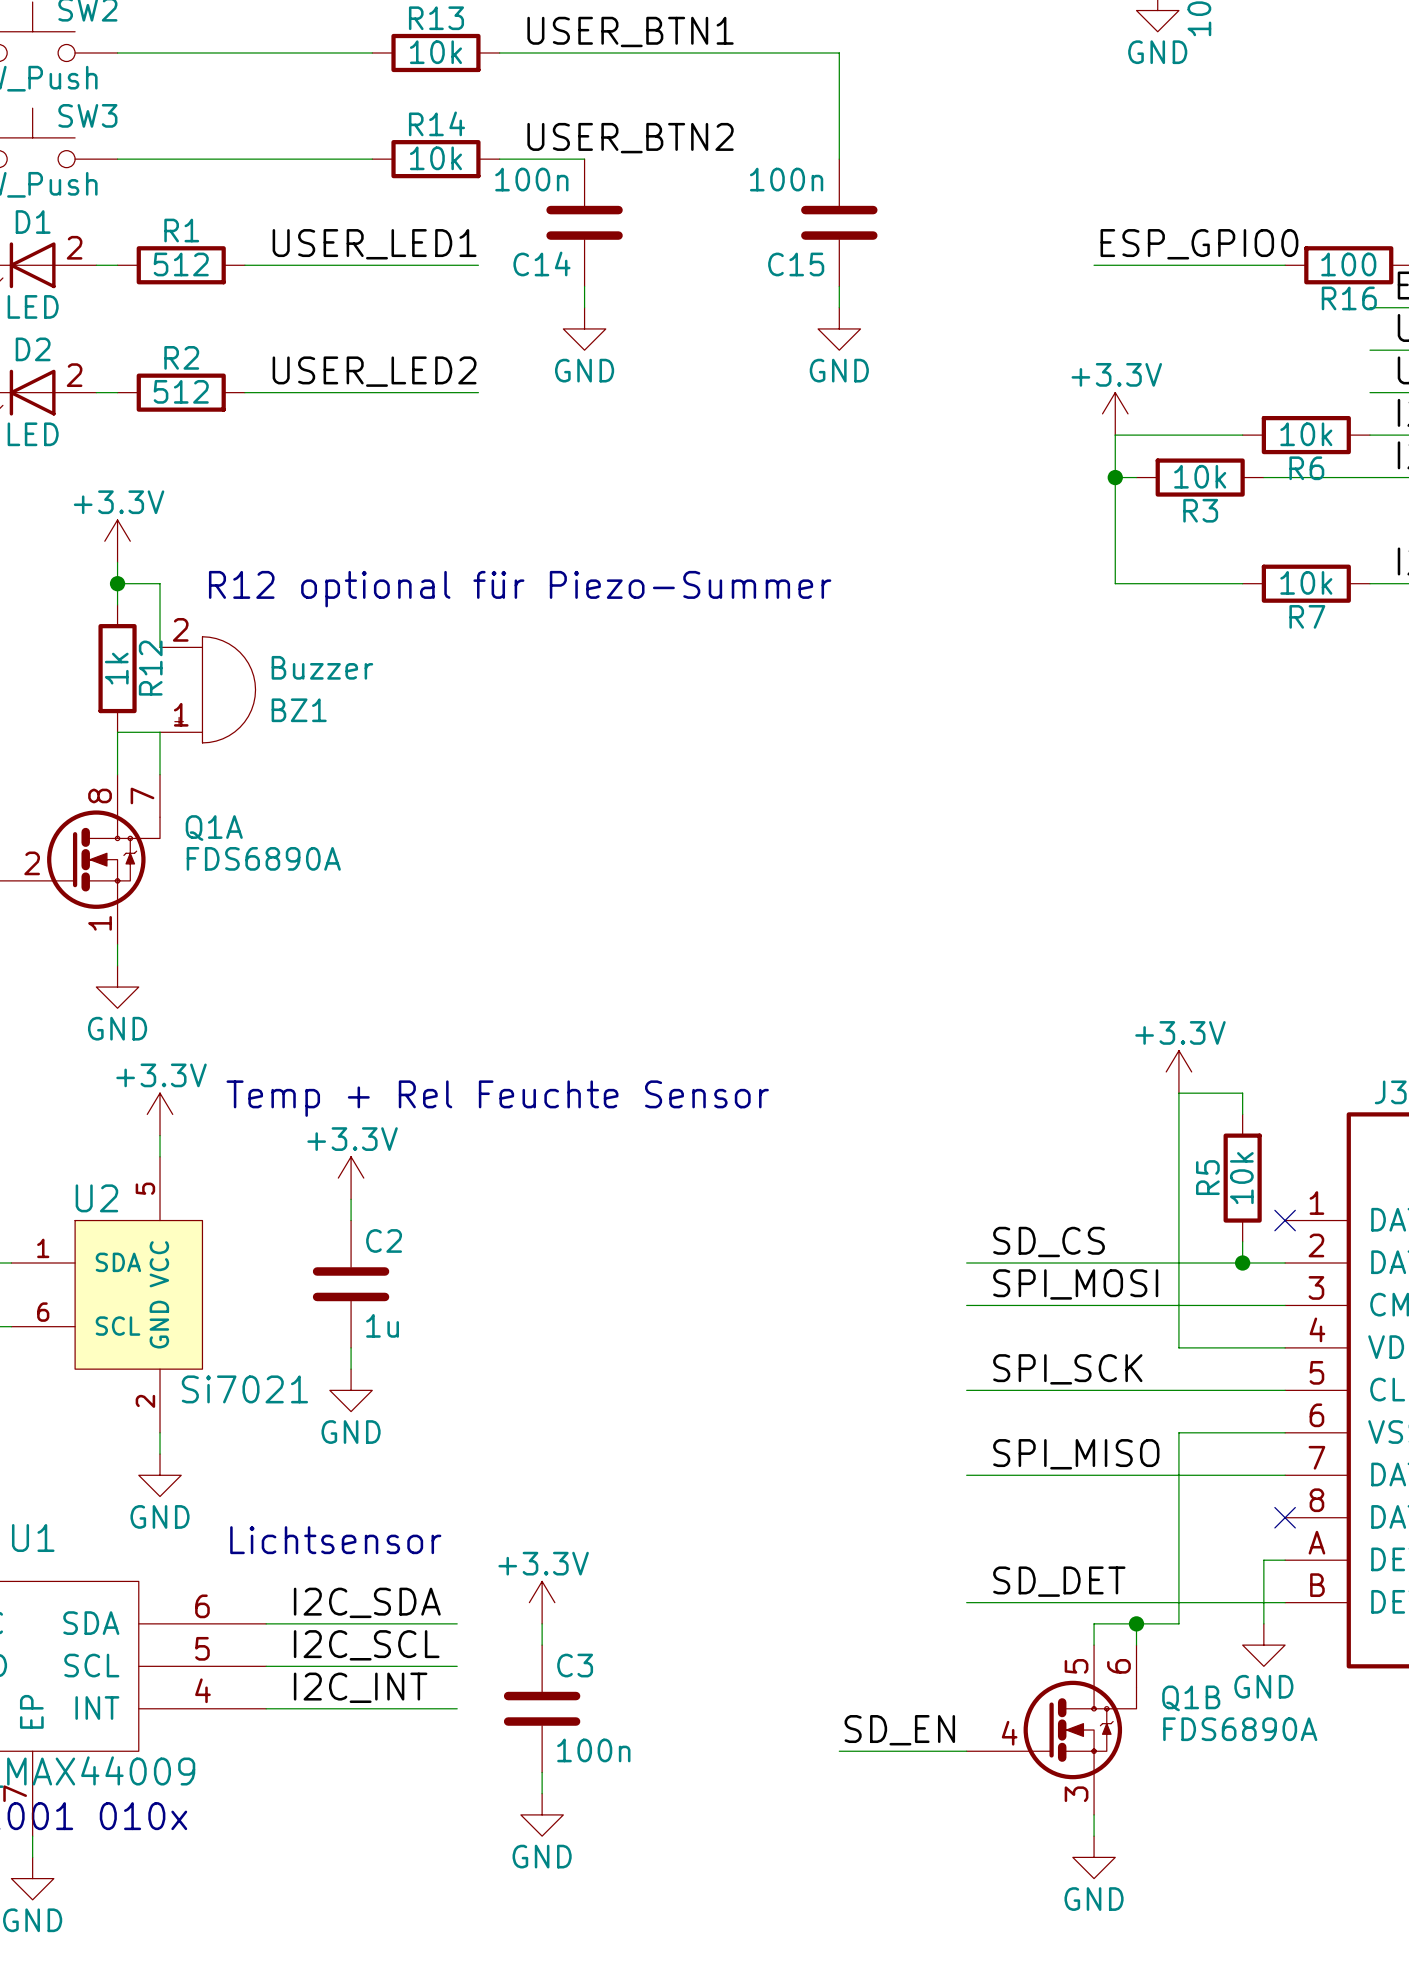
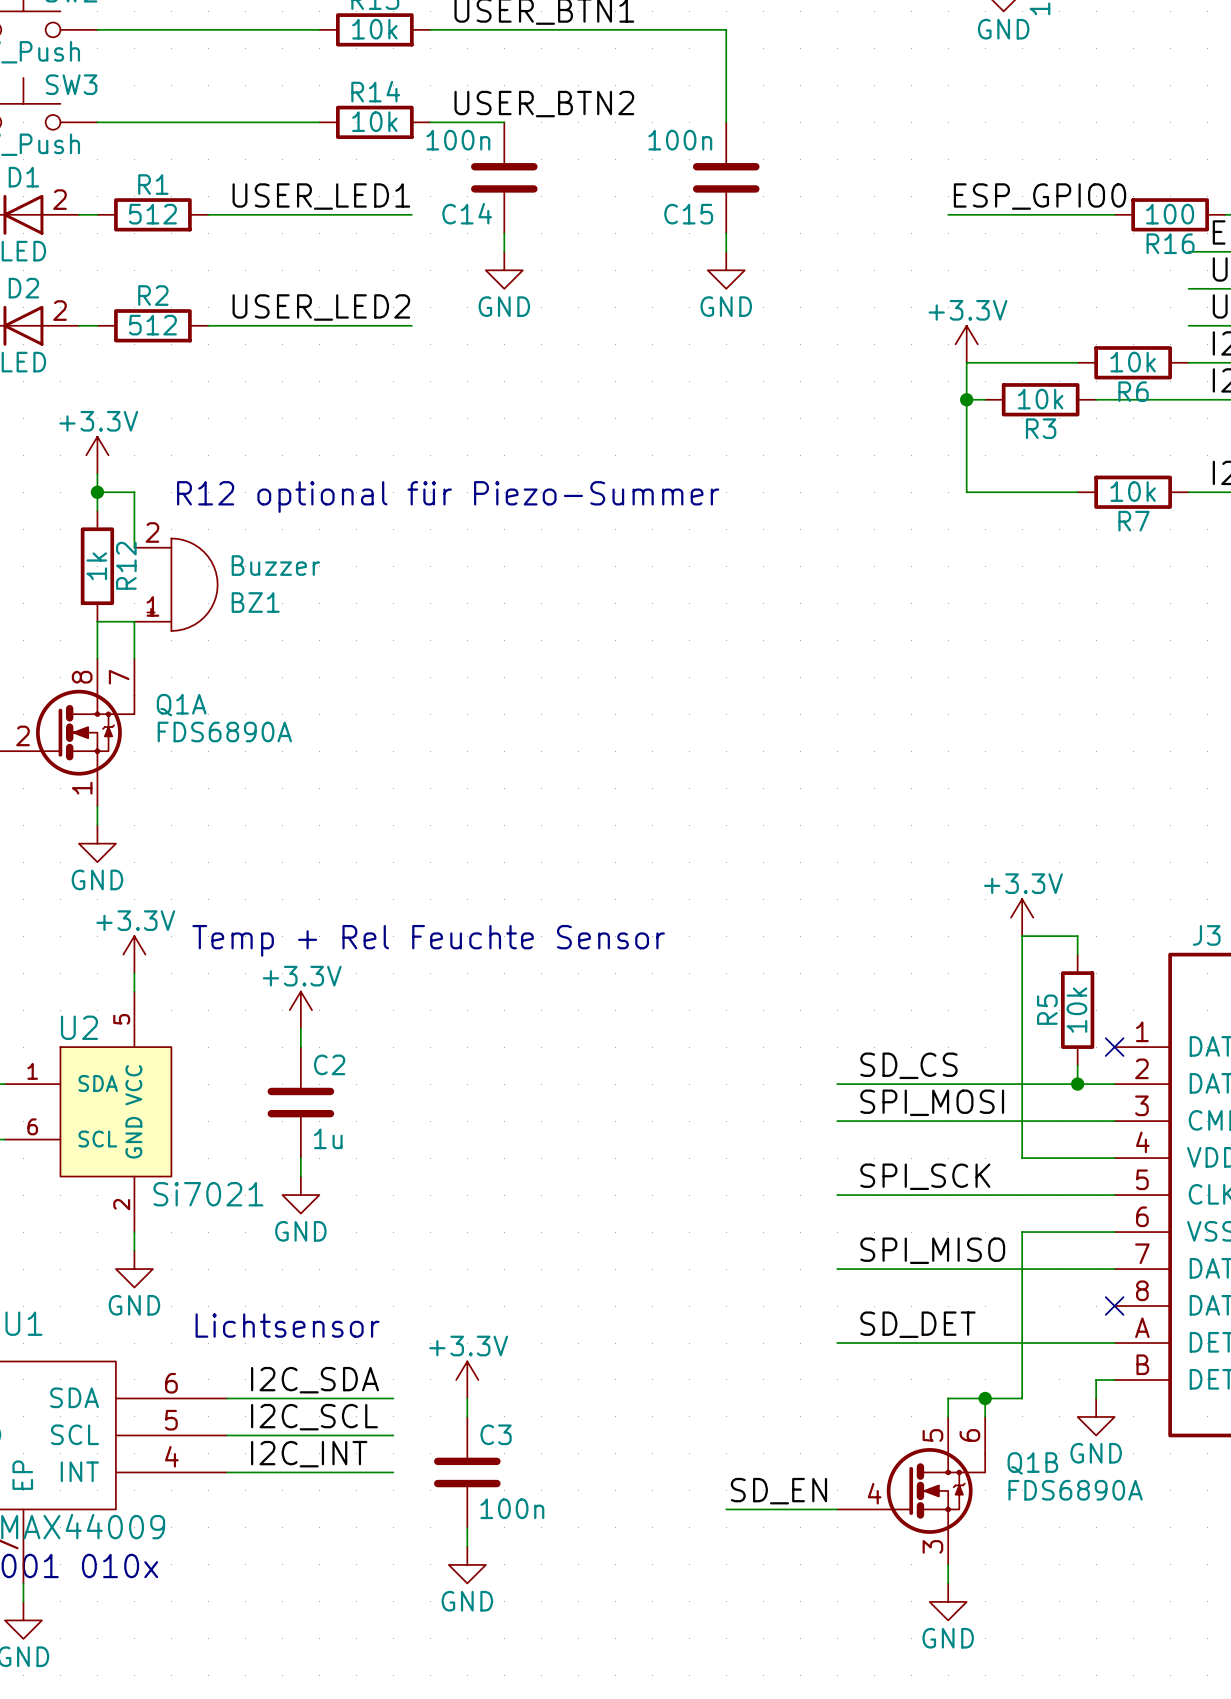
wire: (1263, 1560) (1263, 1602) (966, 1602) -> (1096, 1343) (837, 1343)
label position: SD_DET (1059, 1581) -> SD_DET (917, 1324)

